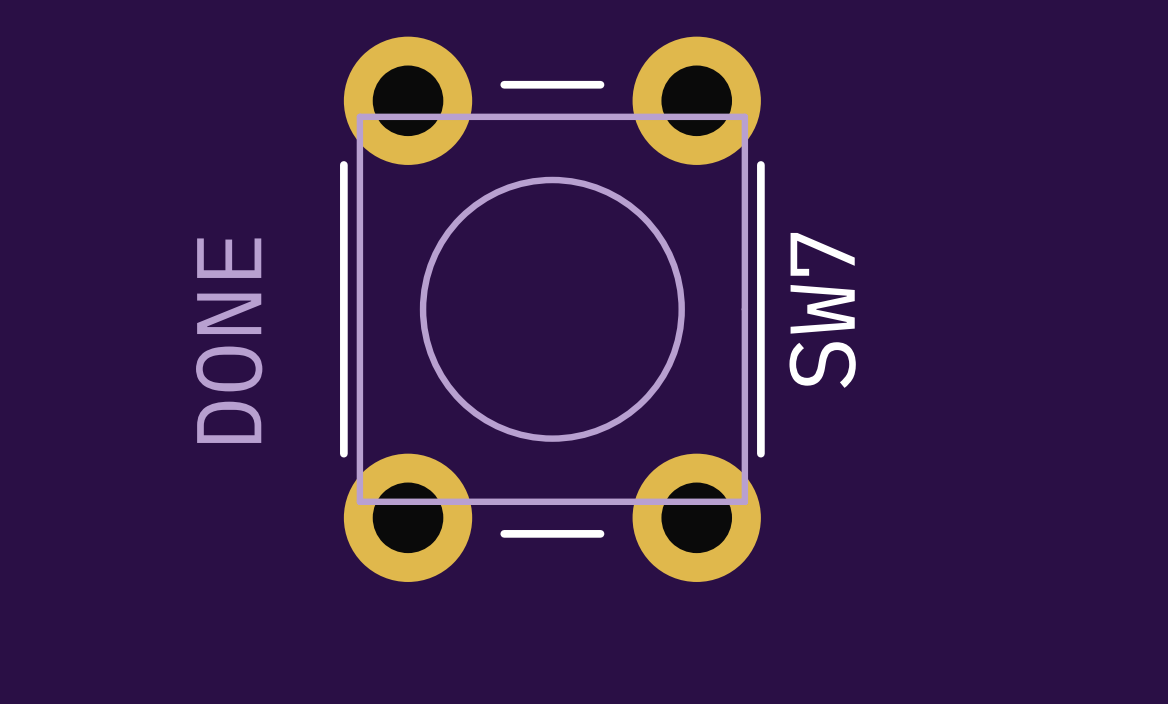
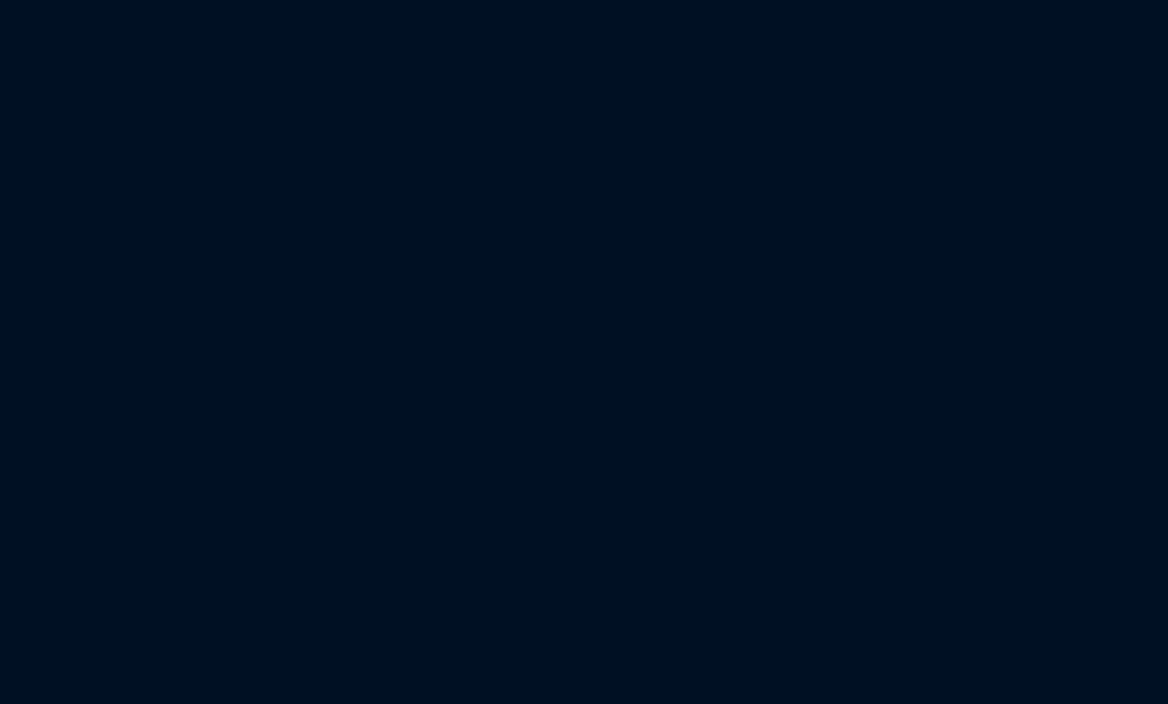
SW7: DONE (552, 309) -> none

